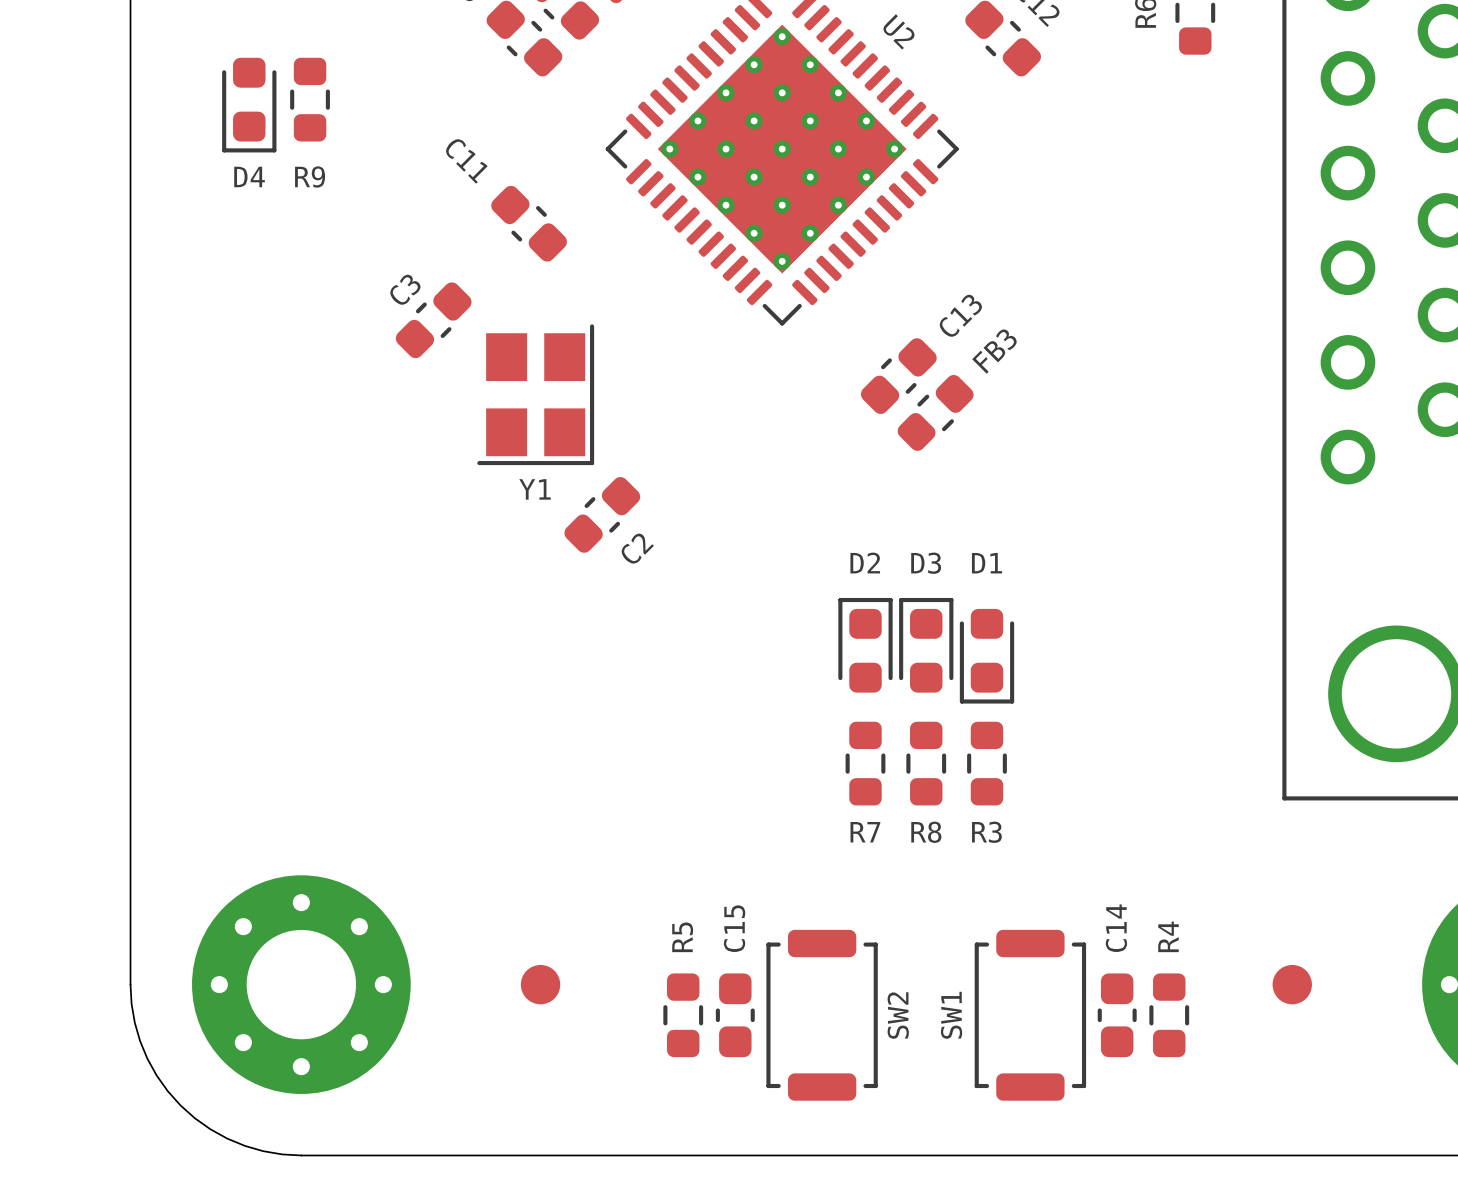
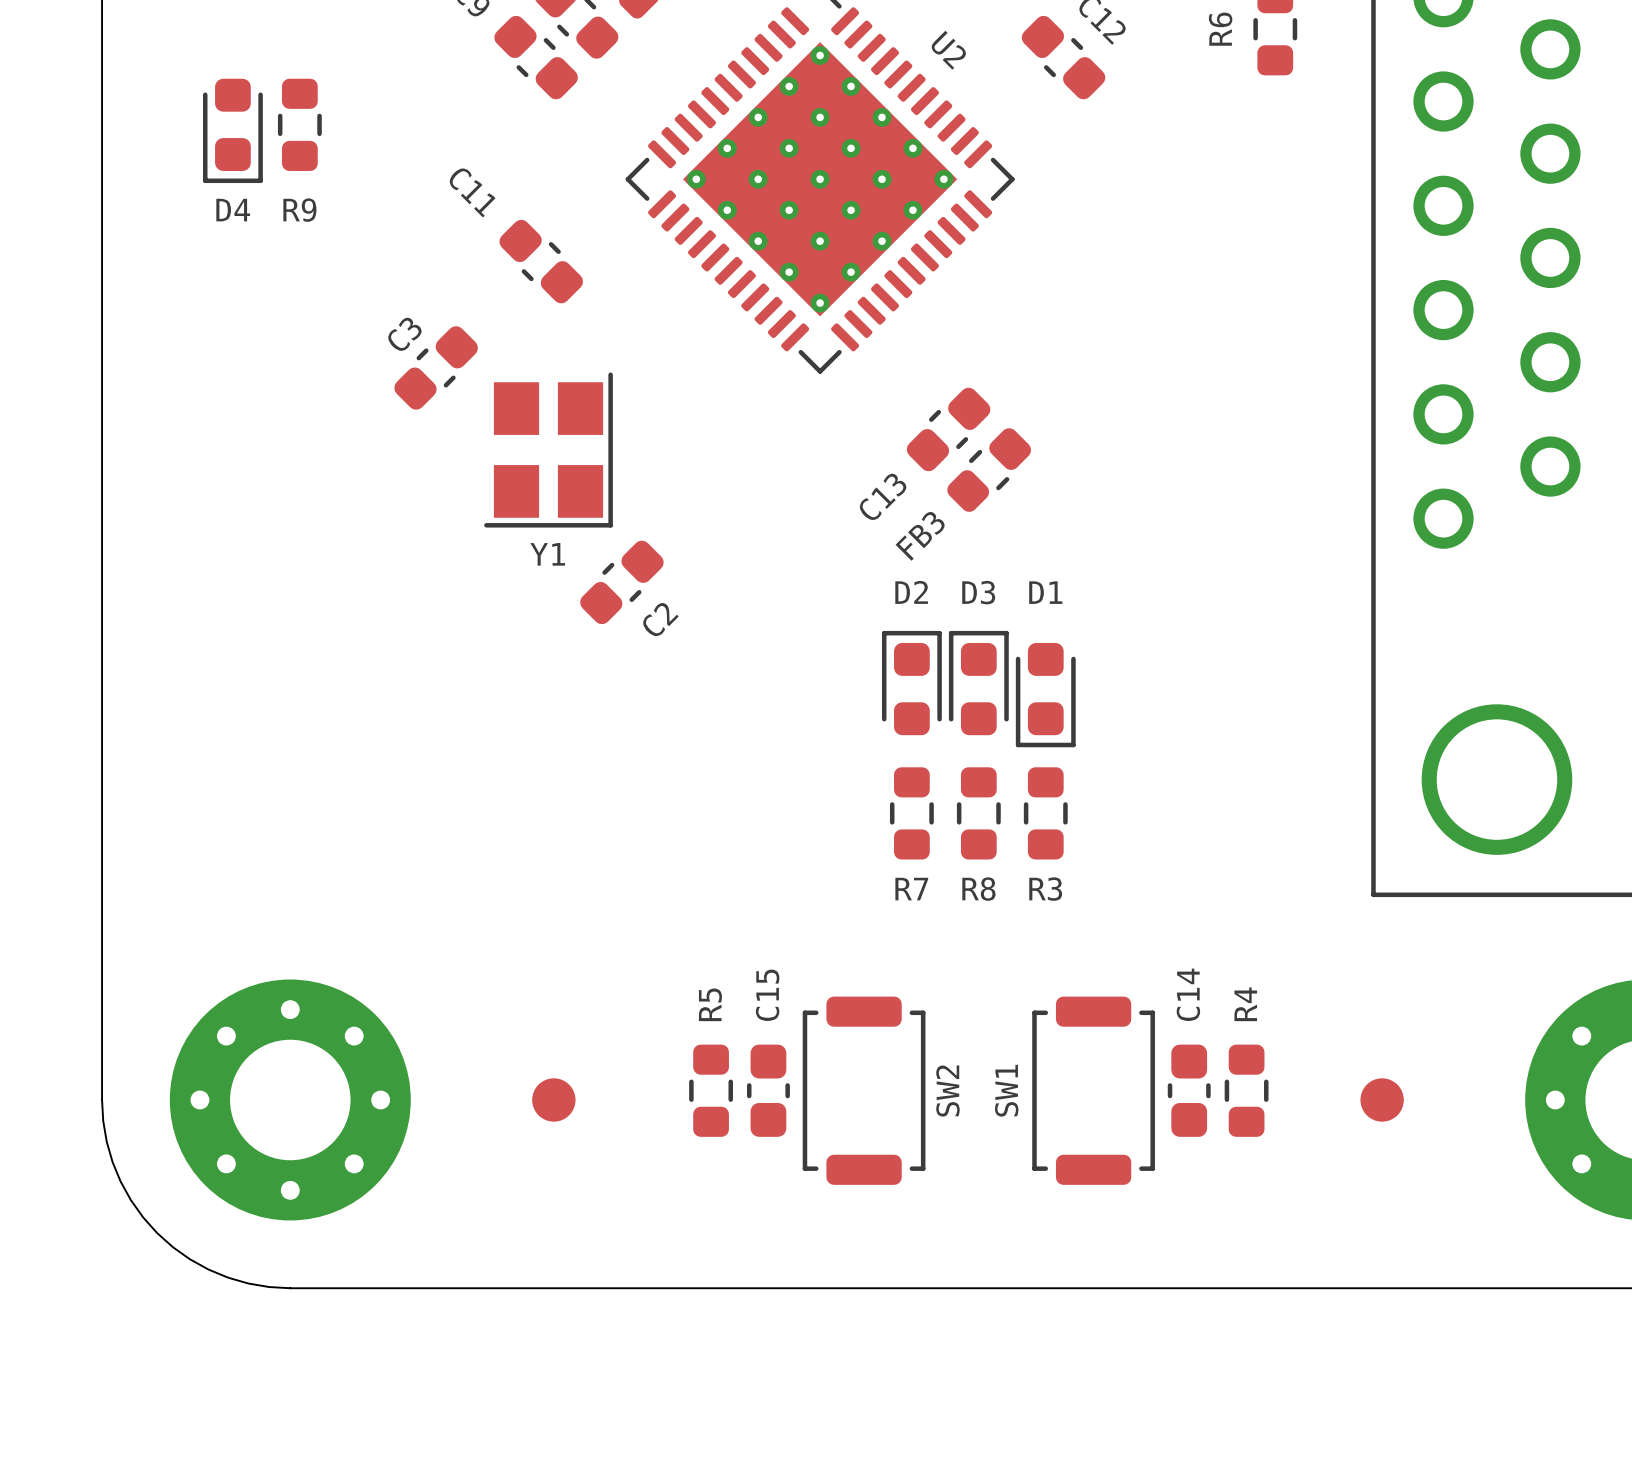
C13 name position: C13 (960, 315) -> C13 (882, 496)
FB3 name position: FB3 (994, 351) -> FB3 (920, 536)
D2 position: (865, 645) -> (911, 683)
D3 position: (926, 645) -> (978, 683)
D1 position: (987, 656) -> (1045, 695)
R7 position: (865, 763) -> (911, 813)
R8 position: (926, 763) -> (978, 813)
R3 position: (987, 763) -> (1045, 813)
R5 position: (683, 1015) -> (711, 1090)
C15 position: (735, 1015) -> (768, 1090)
SW2 position: (822, 1015) -> (864, 1090)
SW1 position: (1030, 1015) -> (1093, 1090)
C14 position: (1117, 1015) -> (1189, 1090)
R4 position: (1169, 1015) -> (1246, 1090)

